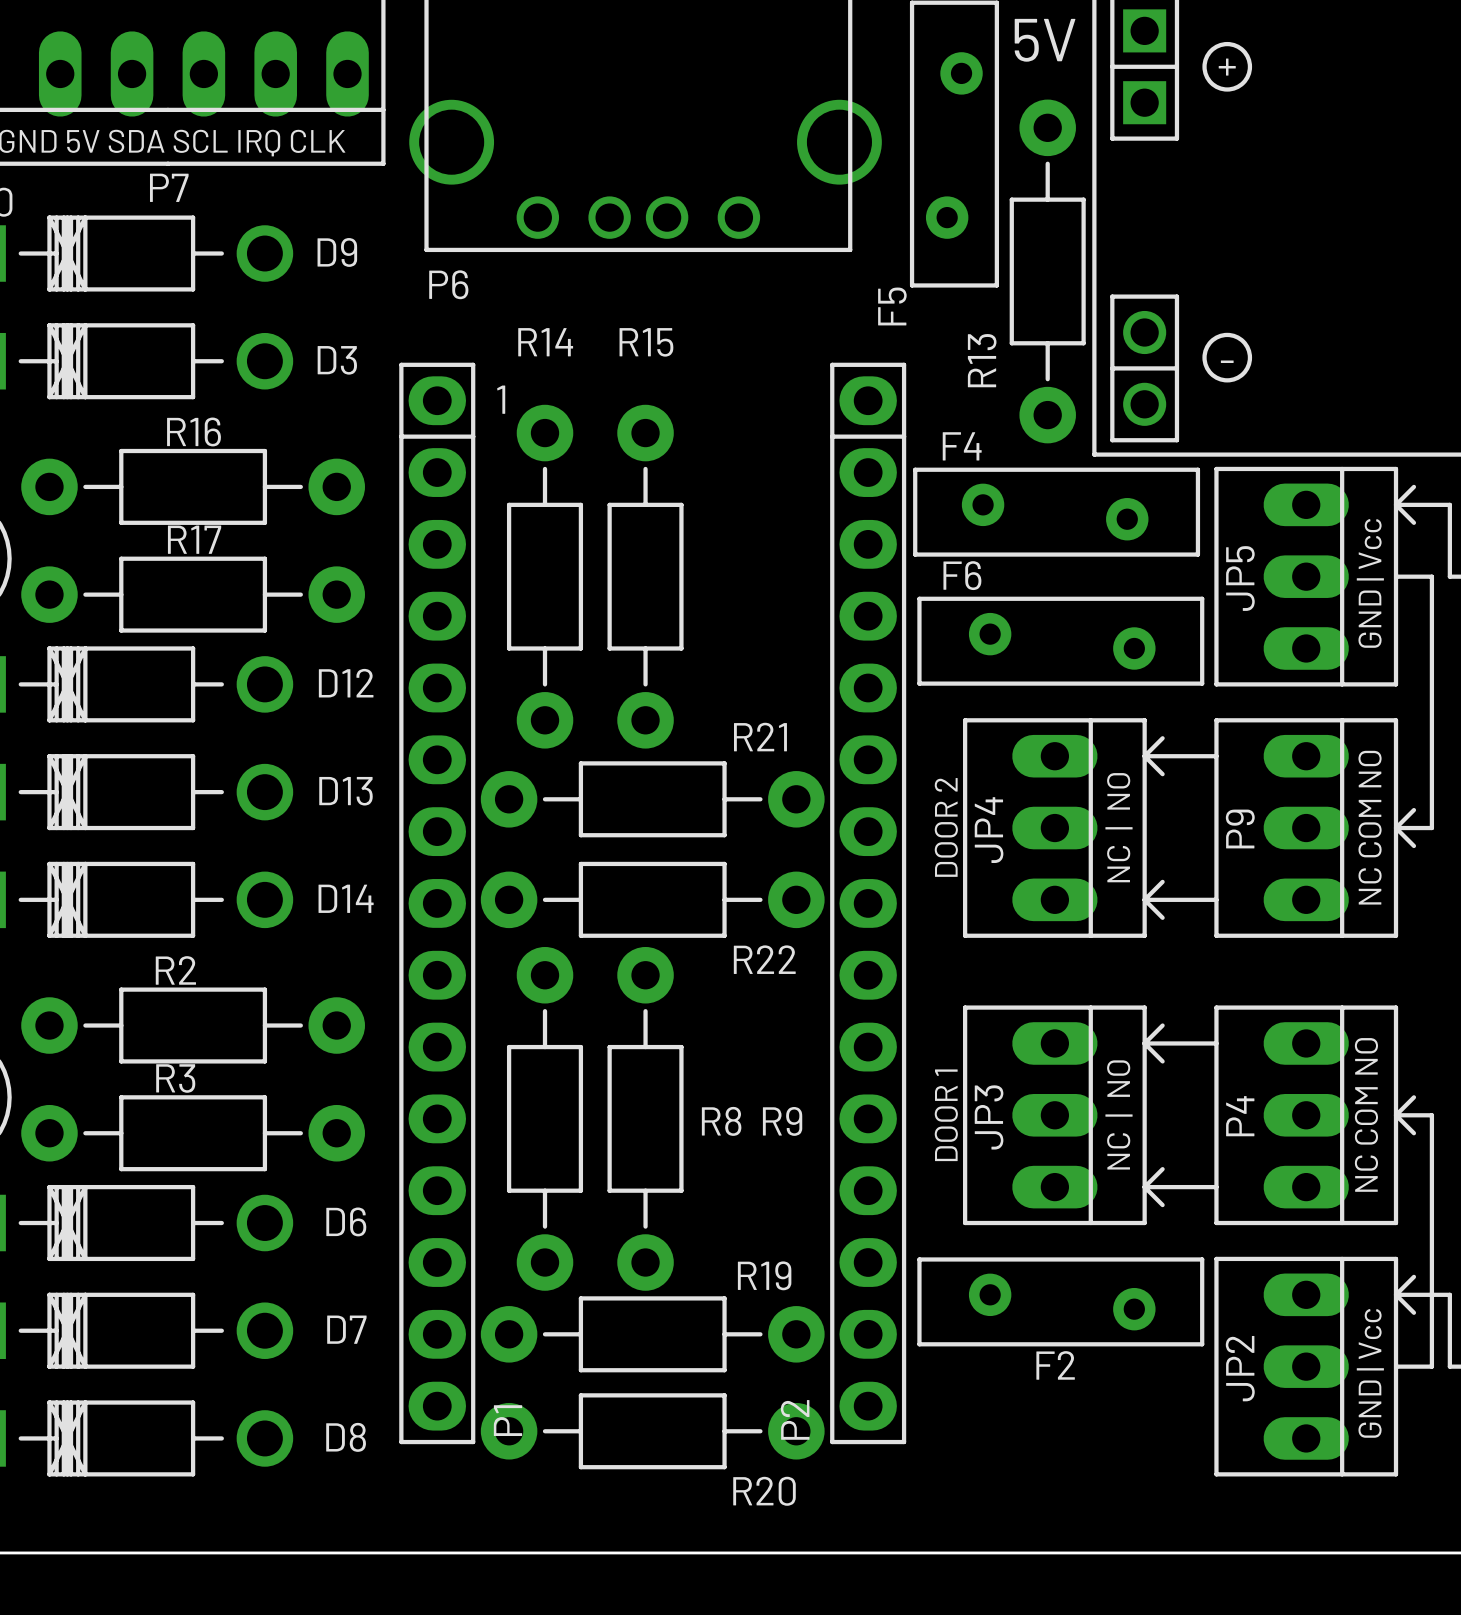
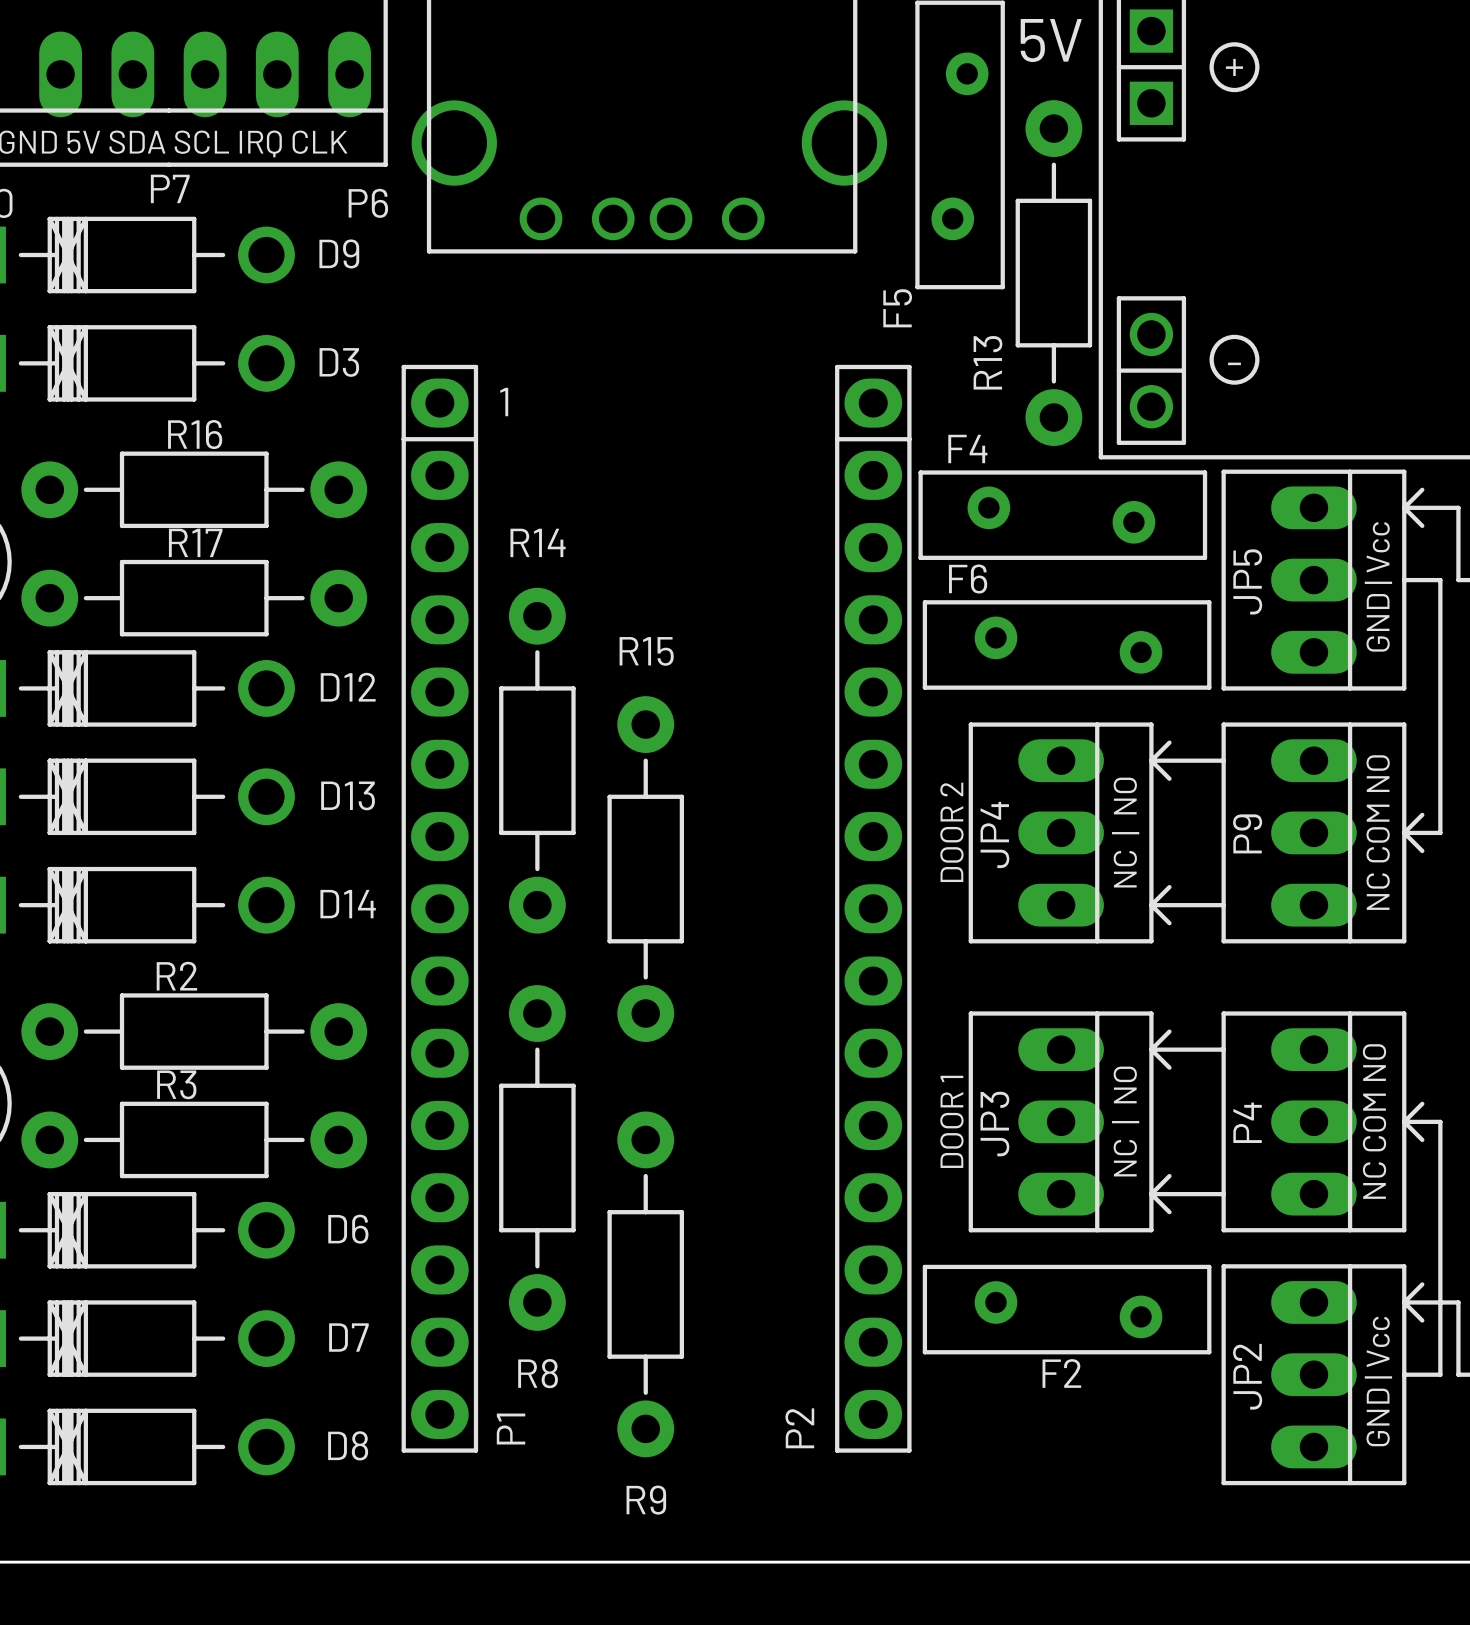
P6 name position: P6 (448, 284) -> P6 (368, 203)
R14 name position: R14 (545, 342) -> R14 (538, 542)
R15 name position: R15 (646, 342) -> R15 (646, 651)
R14 position: (545, 576) -> (537, 760)
R15 position: (645, 576) -> (645, 869)
R21: (652, 799) -> none
R22: (652, 899) -> none
R8 position: (545, 1118) -> (537, 1158)
R9 position: (645, 1118) -> (645, 1284)
R8 name position: R8 (721, 1121) -> R8 (538, 1373)
R9 name position: R9 (782, 1121) -> R9 (646, 1500)
R19: (652, 1334) -> none
R20: (652, 1431) -> none

